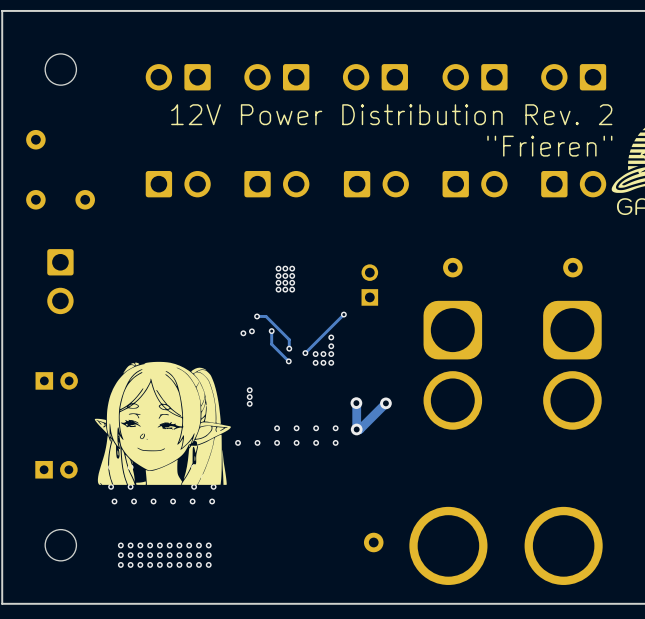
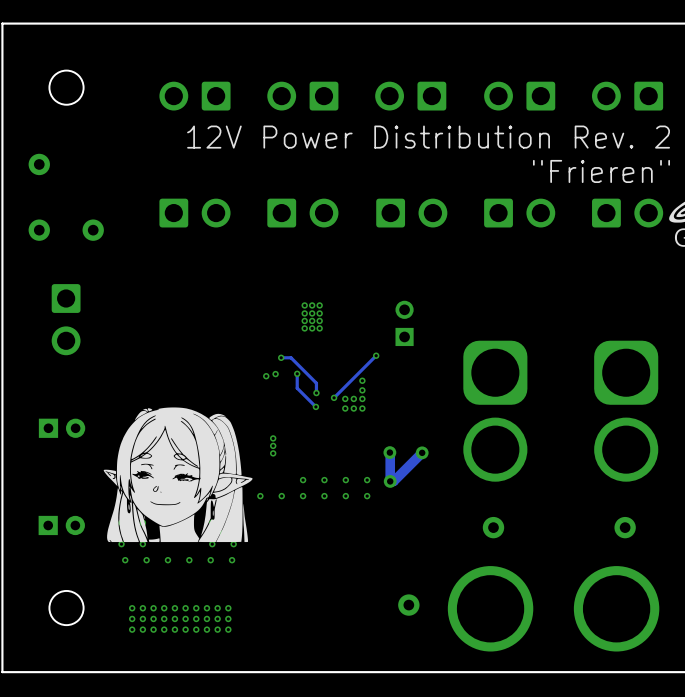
part: (452, 267) -> none
part: (572, 267) -> none
part: none -> (493, 527)
part: none -> (625, 527)

